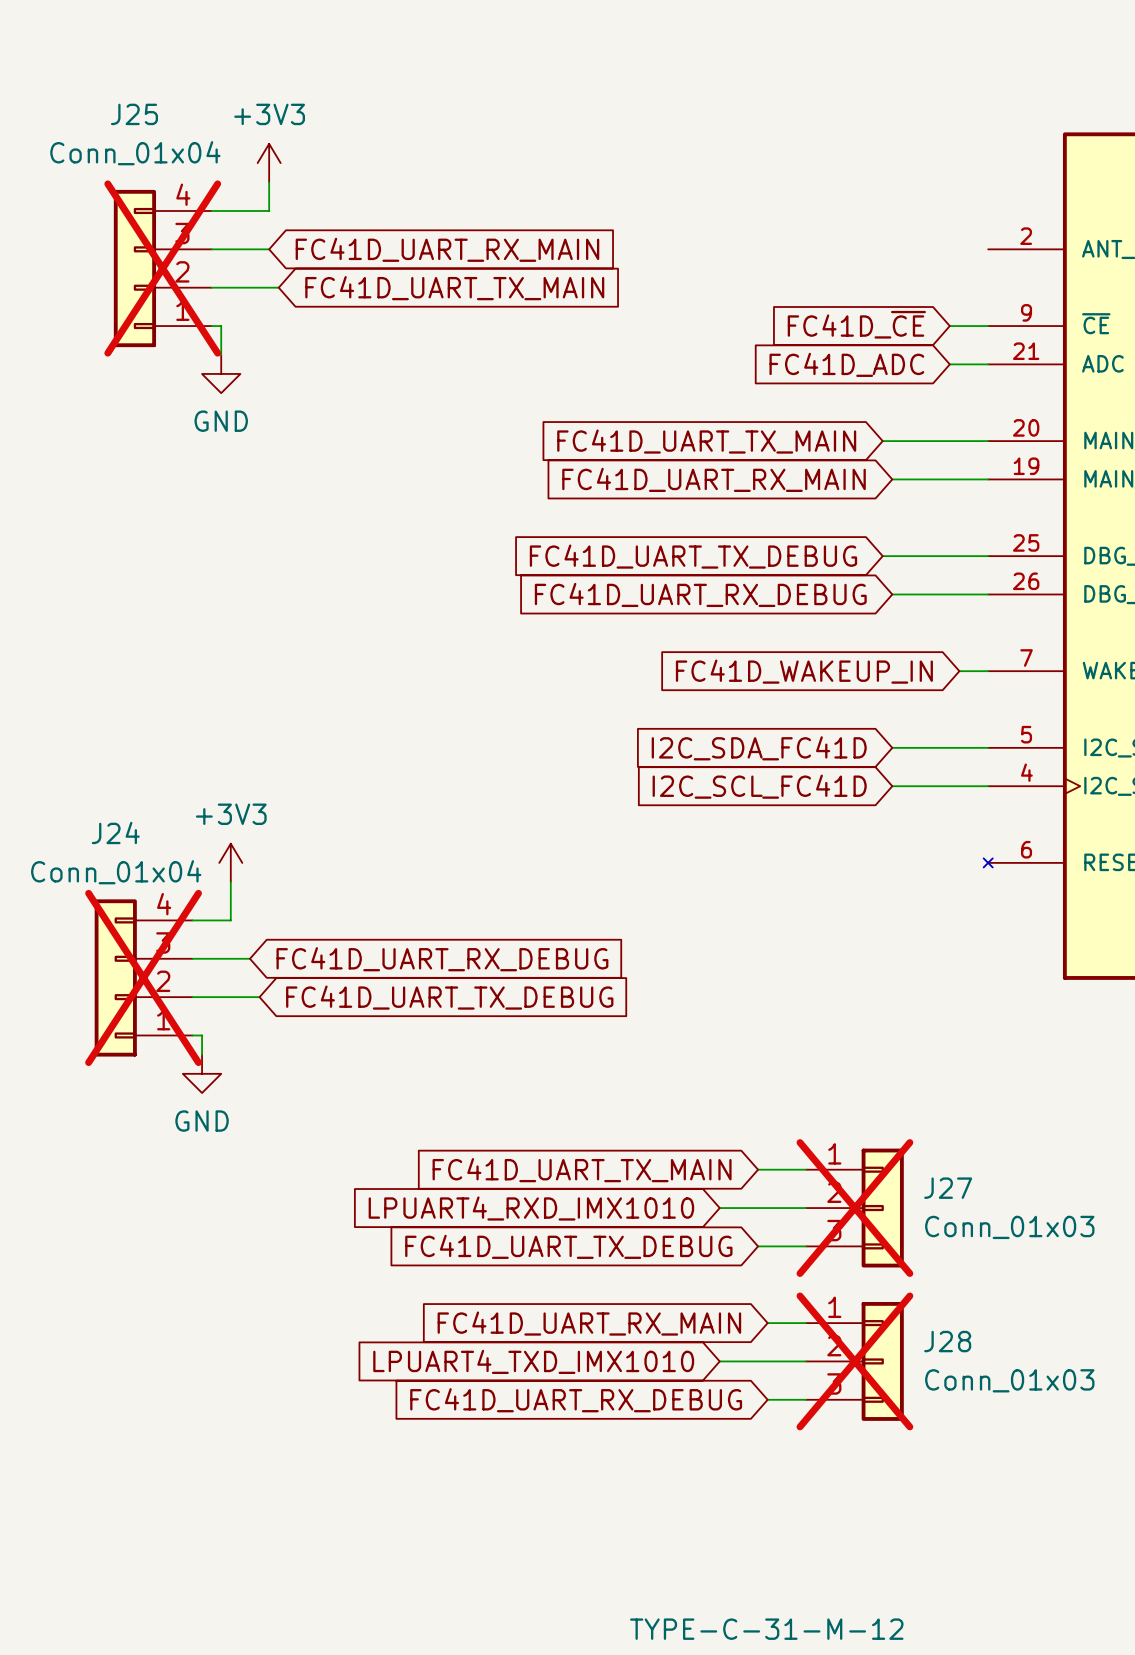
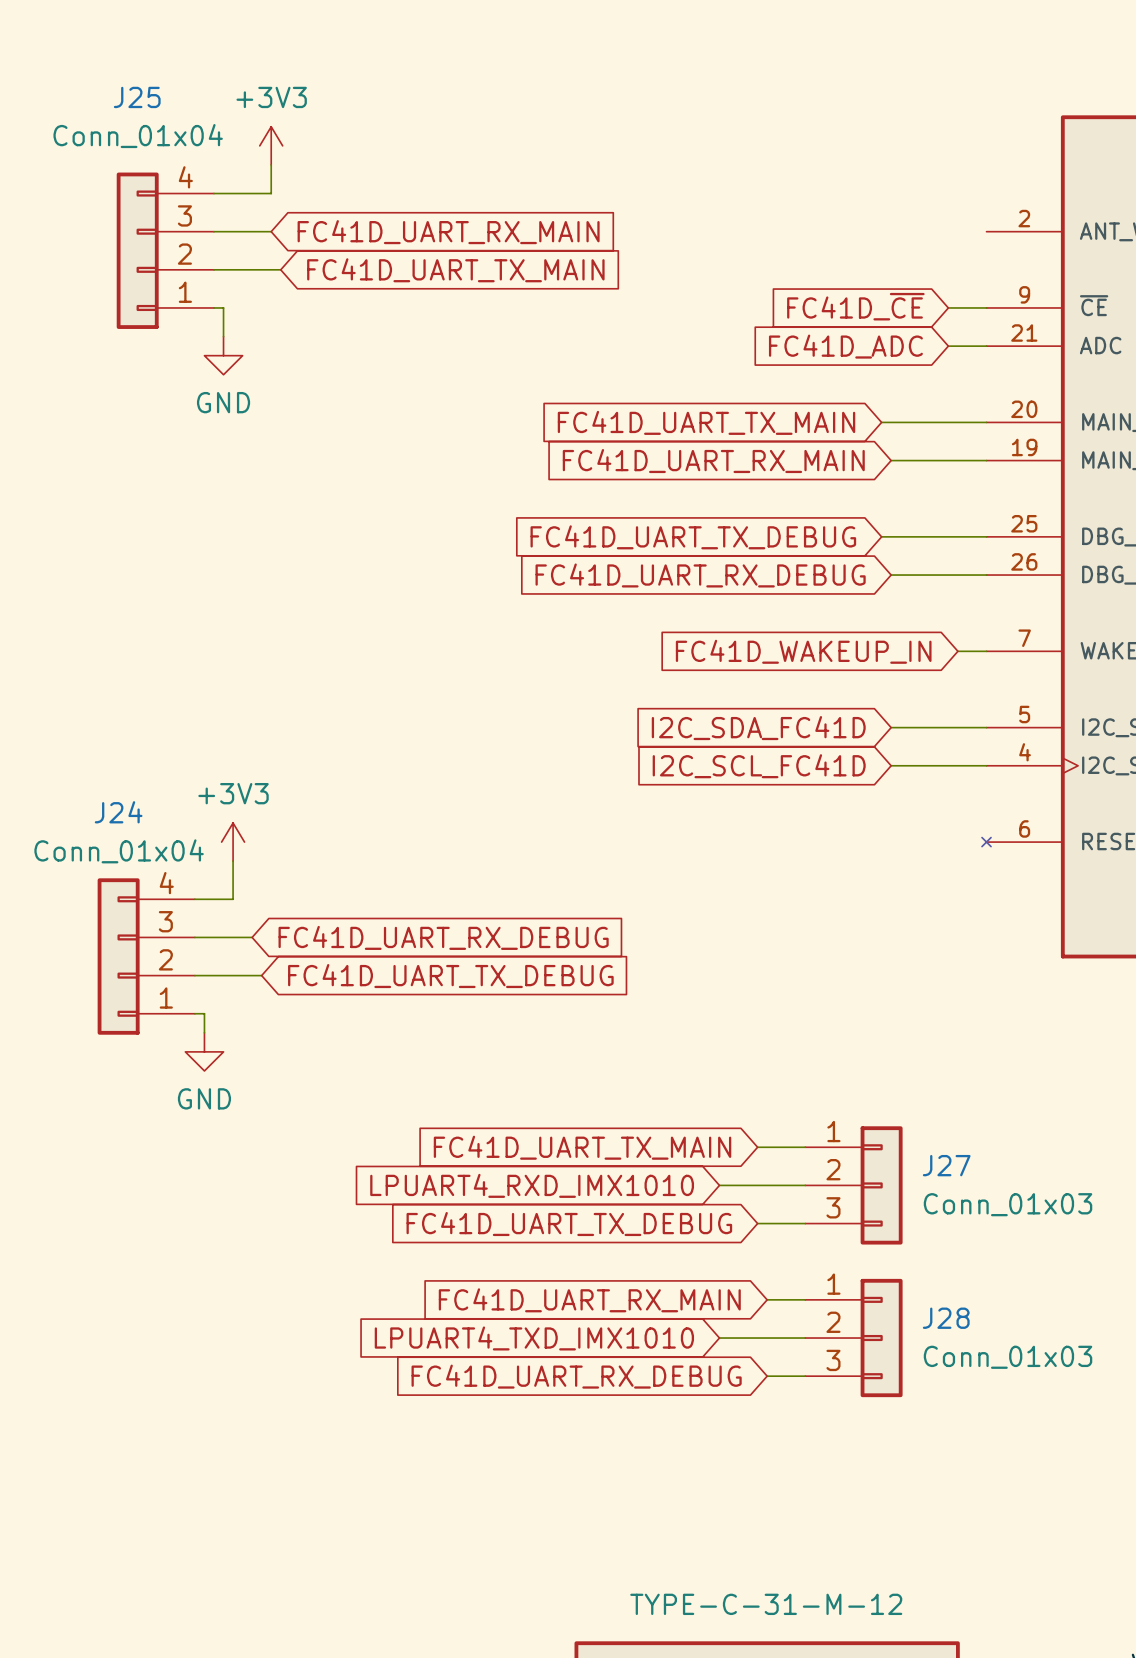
J25 do-not-place cross: (162, 268) -> none
J24 do-not-place cross: (143, 977) -> none
J27 do-not-place cross: (854, 1208) -> none
J28 do-not-place cross: (854, 1361) -> none

